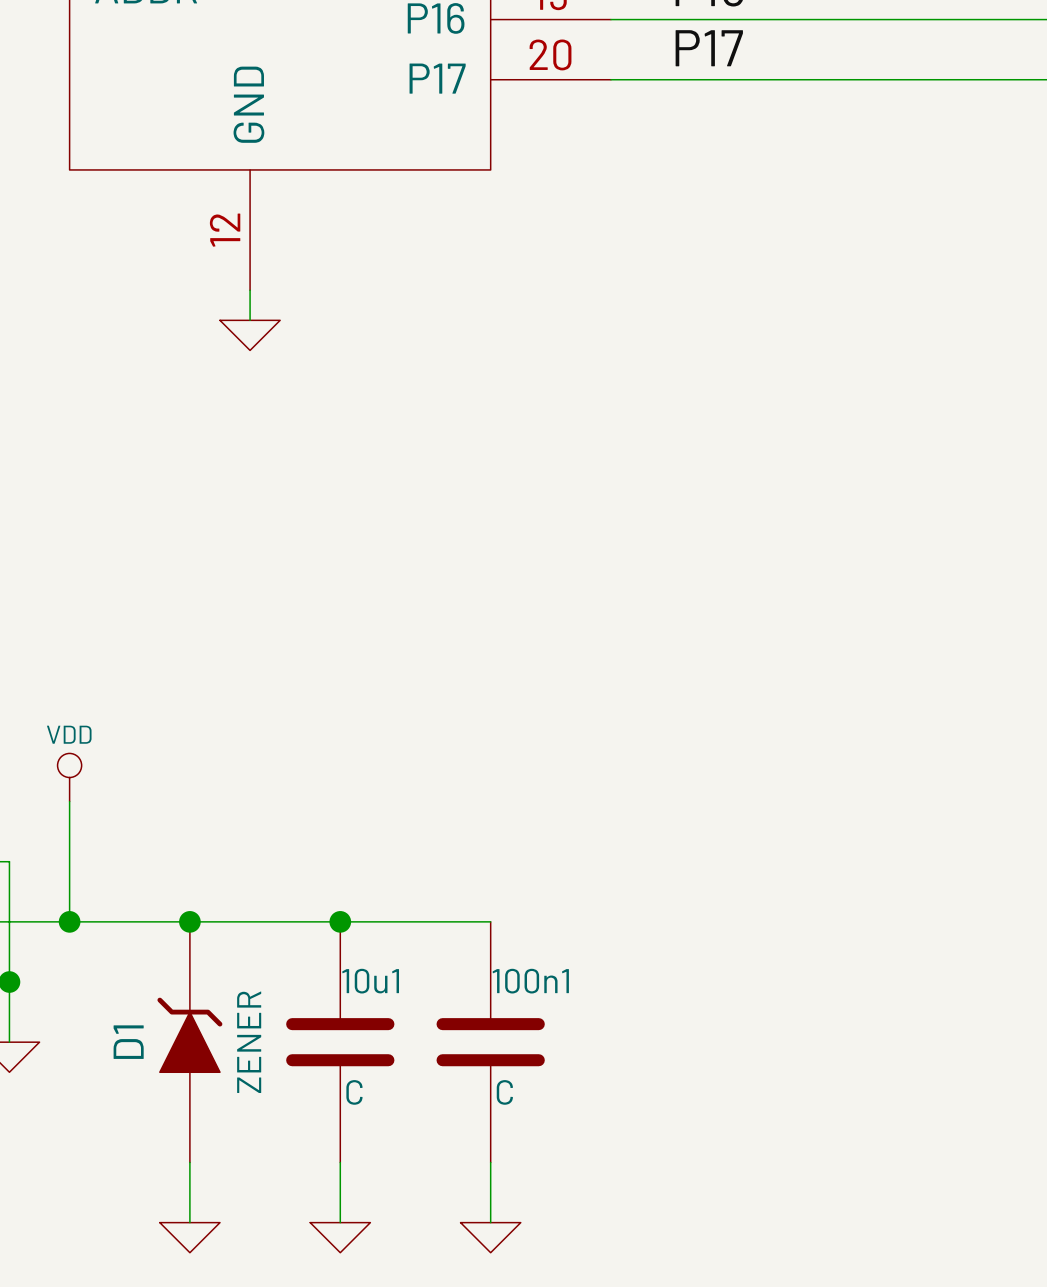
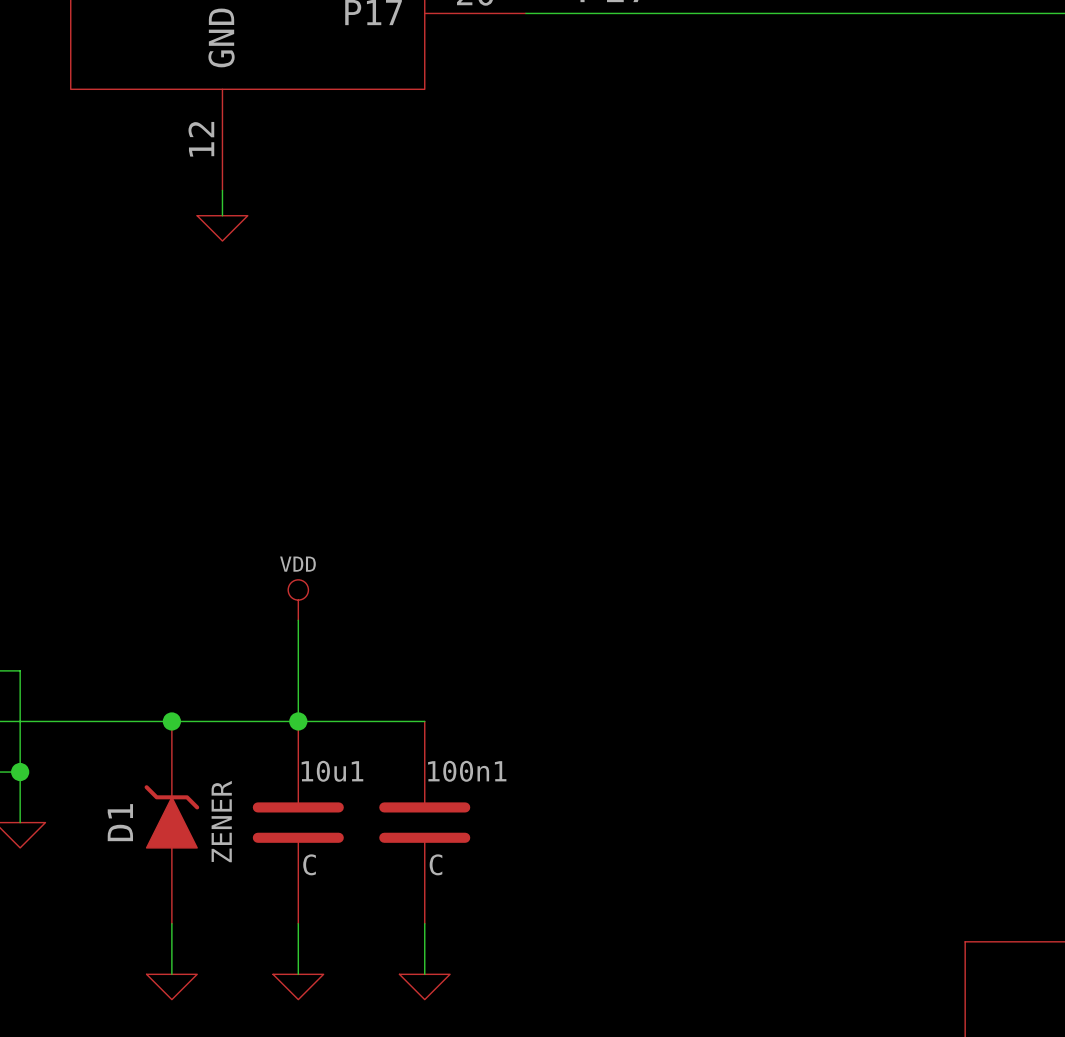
power symbol position: VDD (69, 777) -> VDD (298, 600)
wire: (69, 801) (69, 921) -> (298, 620) (298, 721)
junction: (69, 921) -> none

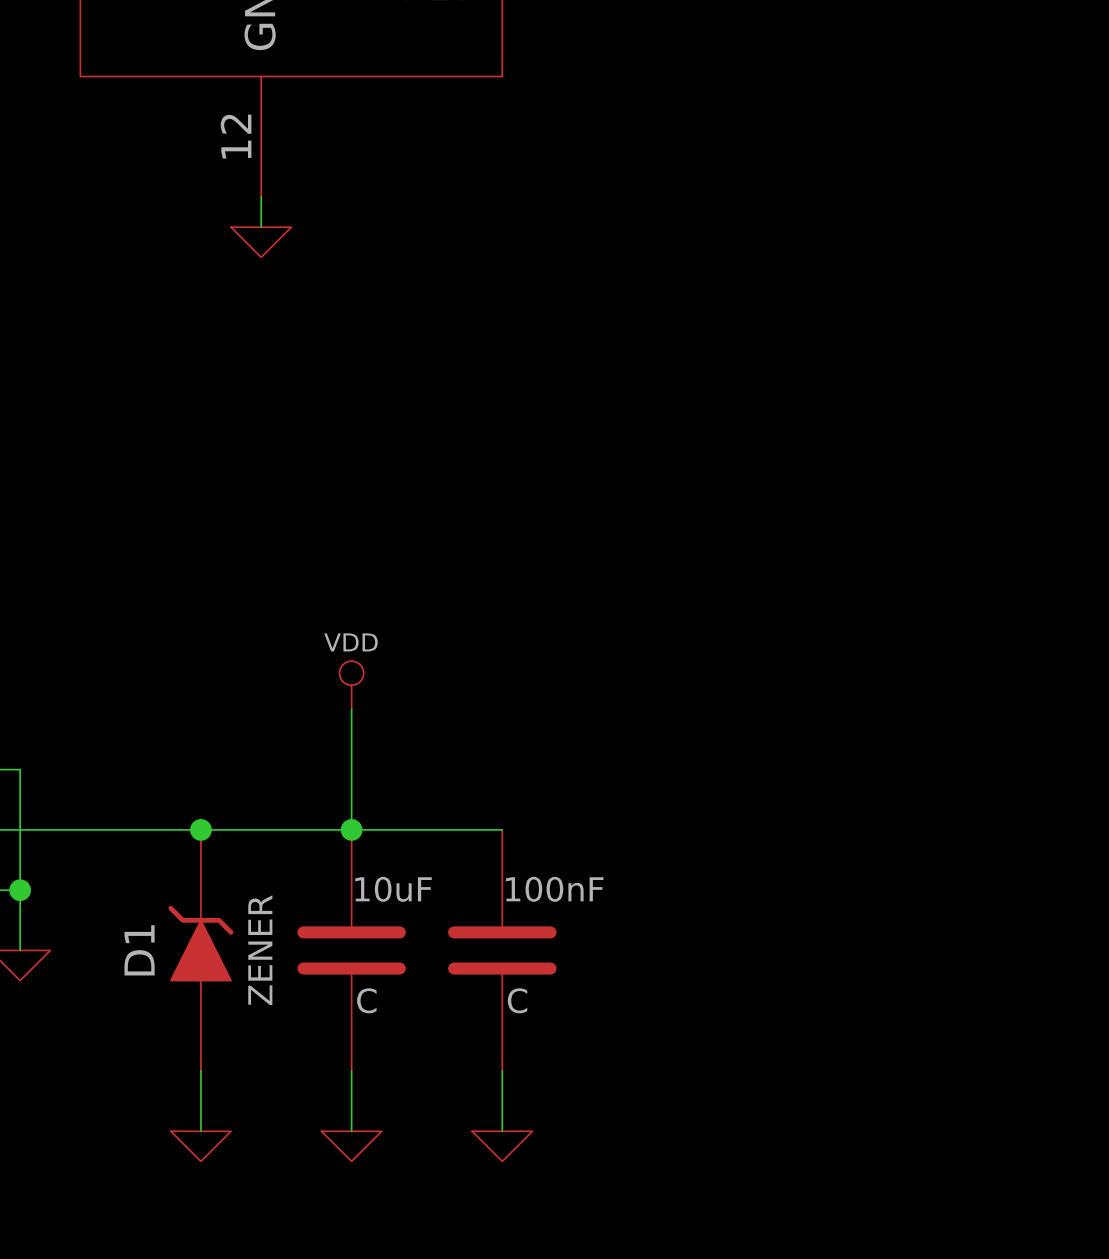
10u1 name: 10u1 (332, 771) -> 10uF (393, 889)
100n1 name: 100n1 (467, 771) -> 100nF (554, 889)

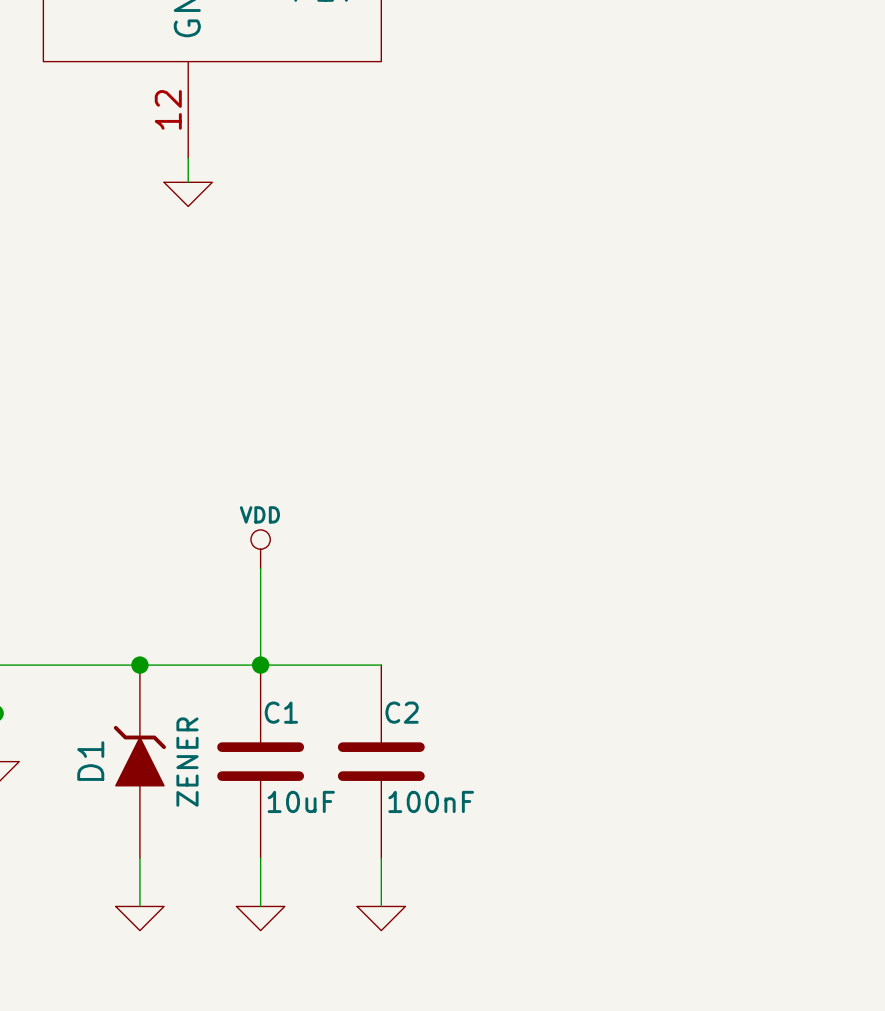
10uF name: 10uF (393, 889) -> C1 (281, 712)
100nF name: 100nF (554, 889) -> C2 (402, 712)
10uF value: C (366, 1000) -> 10uF (301, 801)
100nF value: C (517, 1000) -> 100nF (431, 801)

